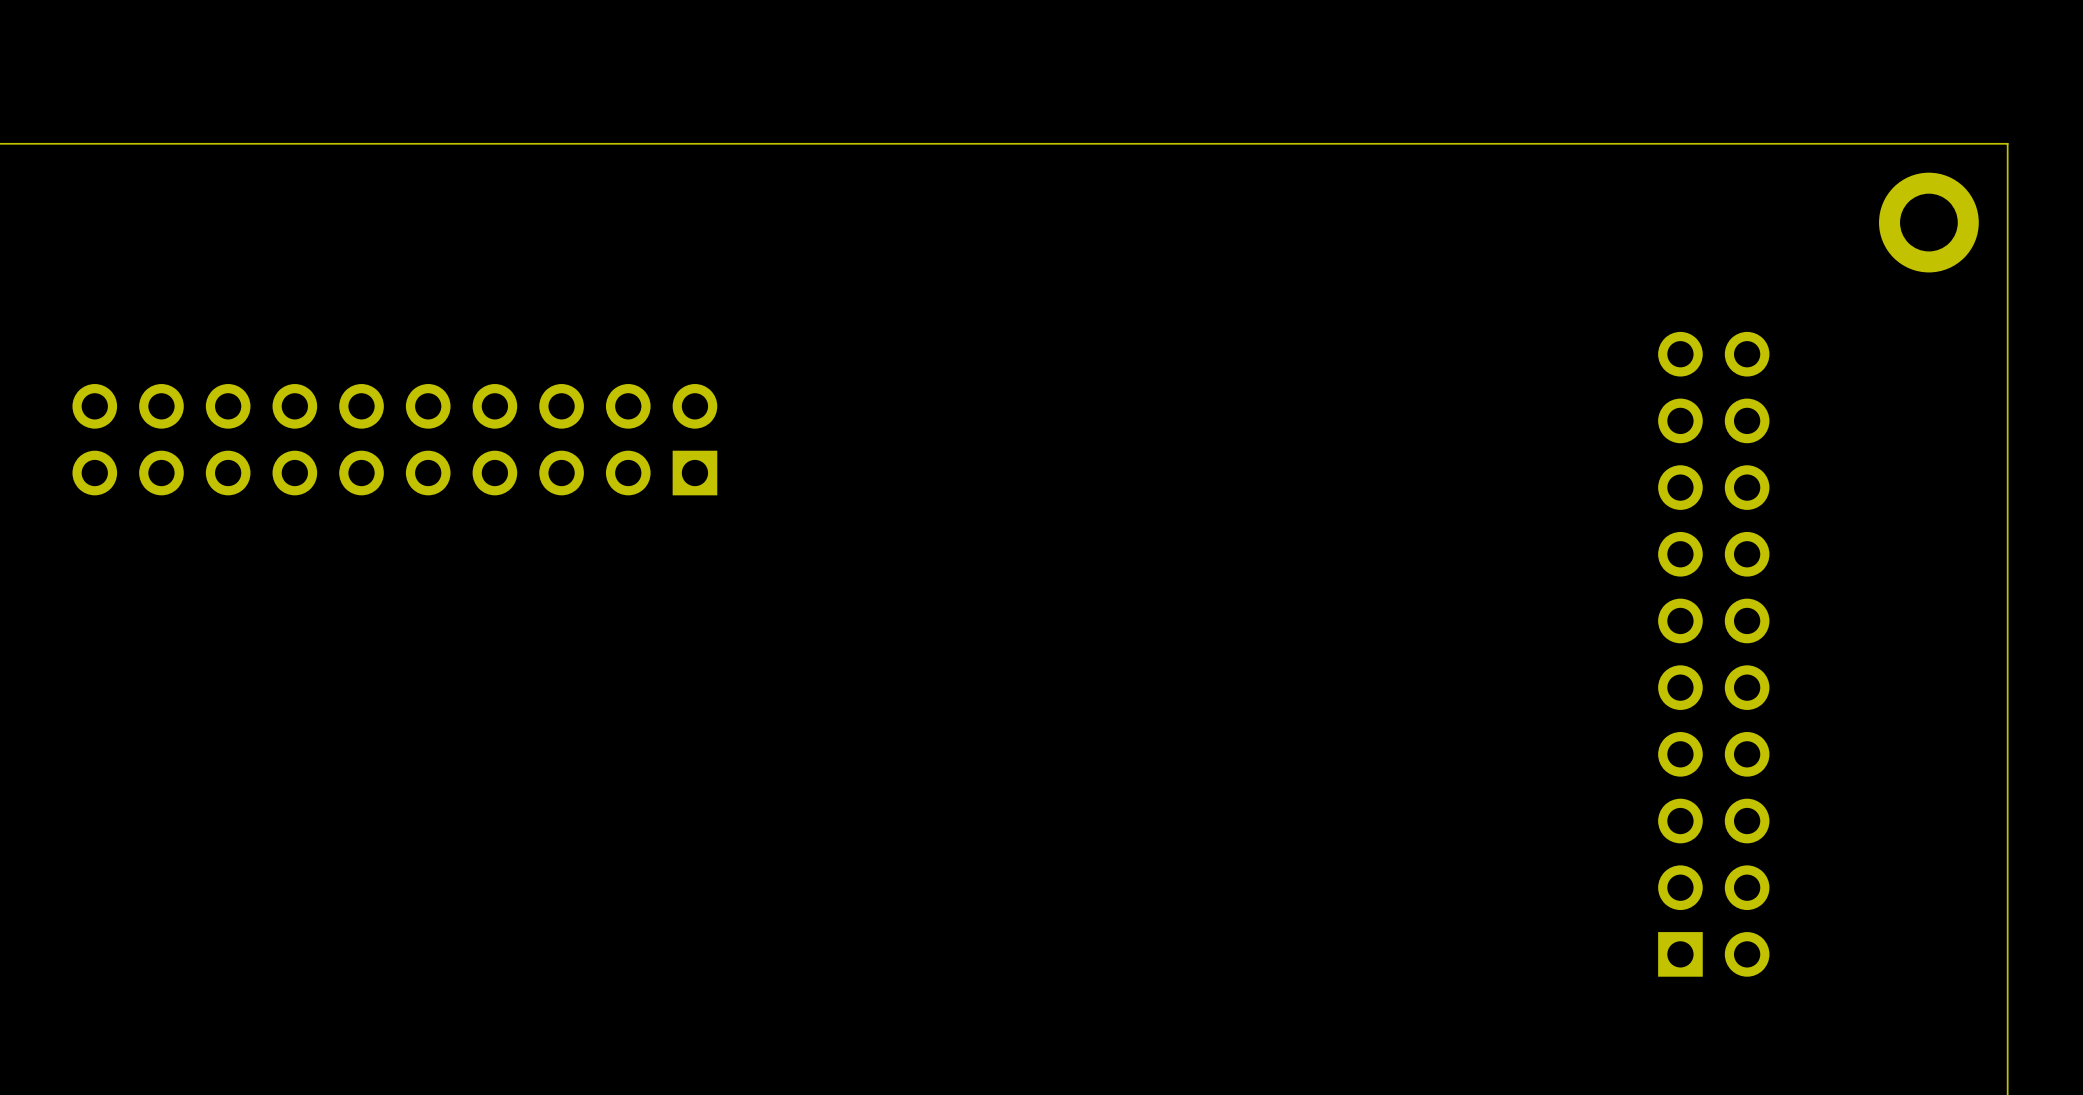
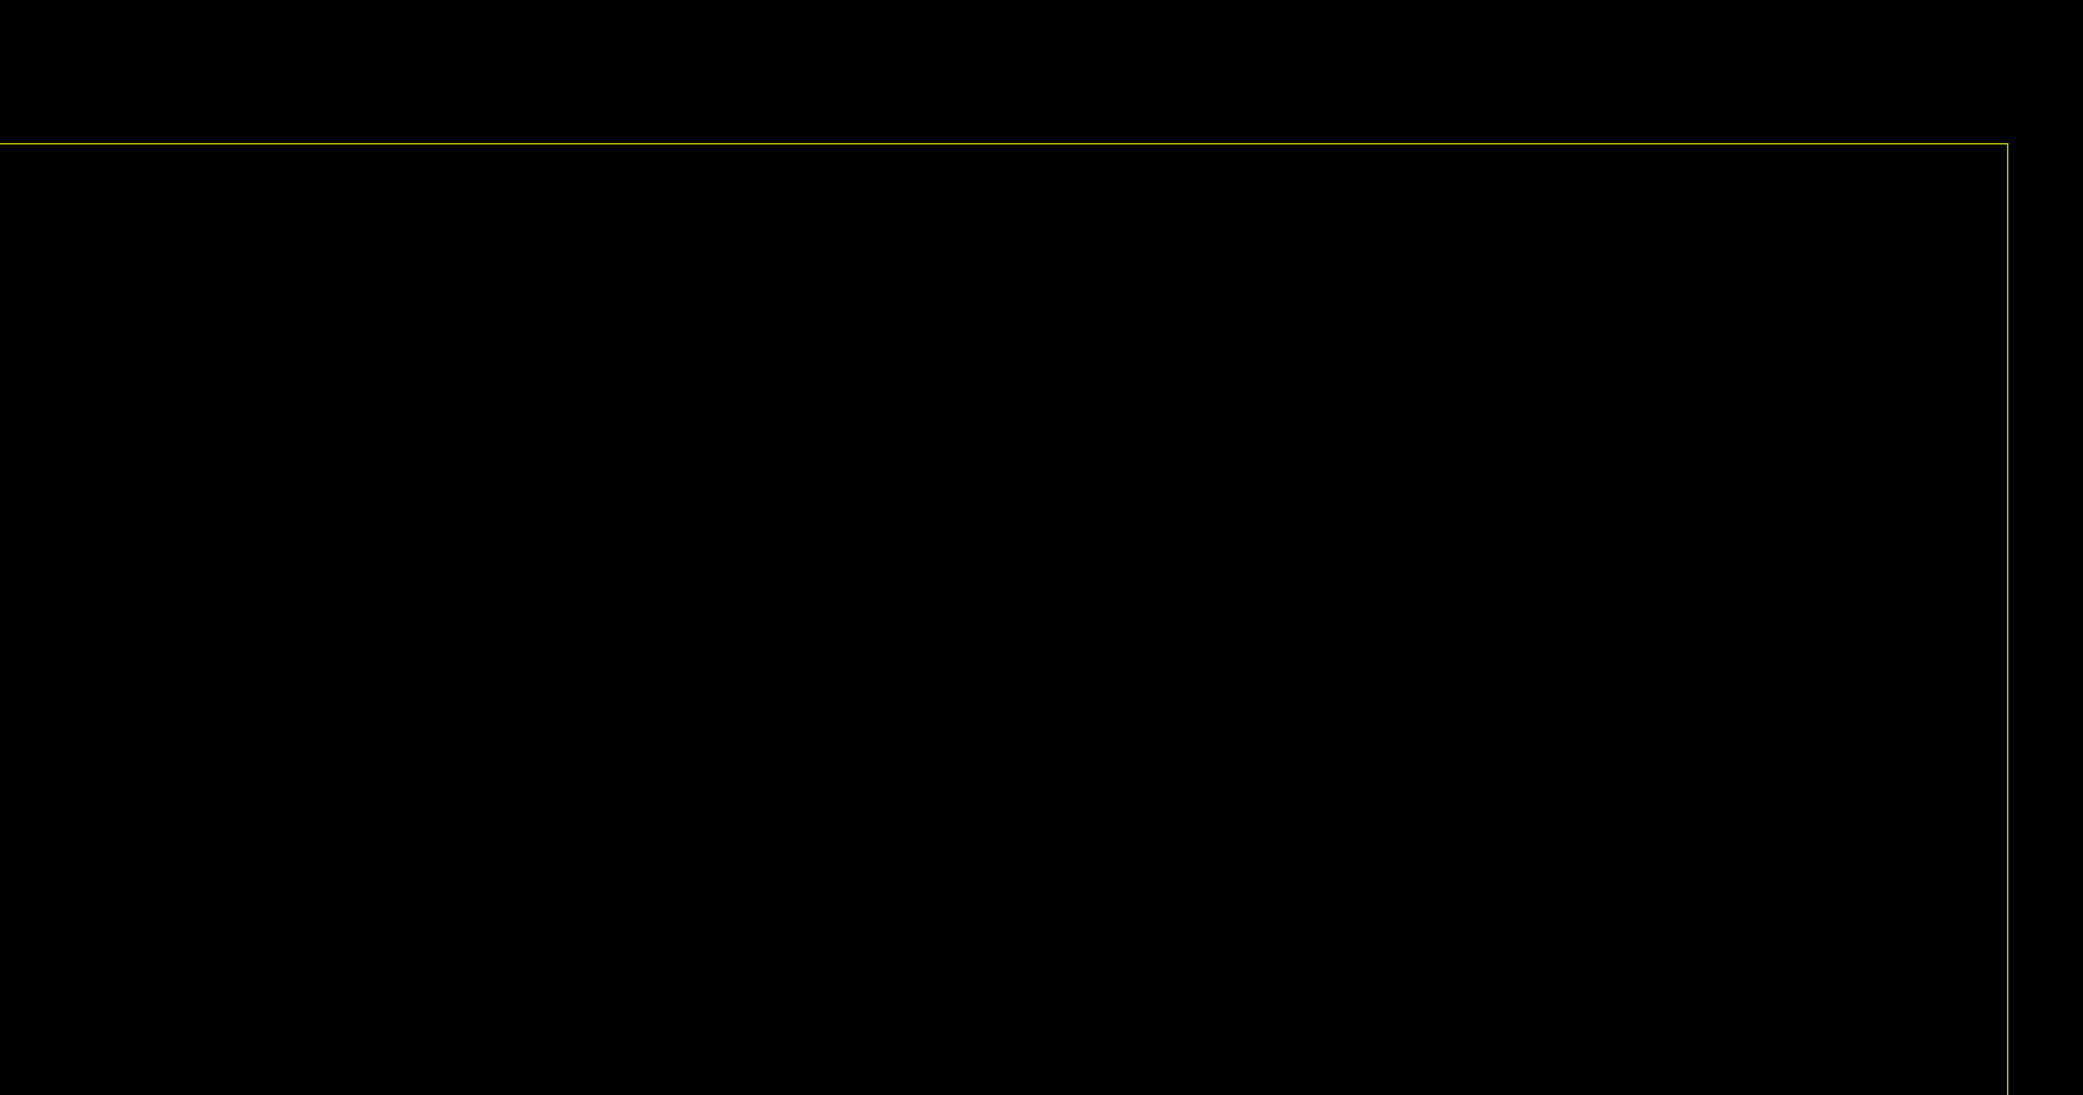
part: (1928, 222) -> none
part: (394, 439) -> none
part: (1713, 654) -> none

